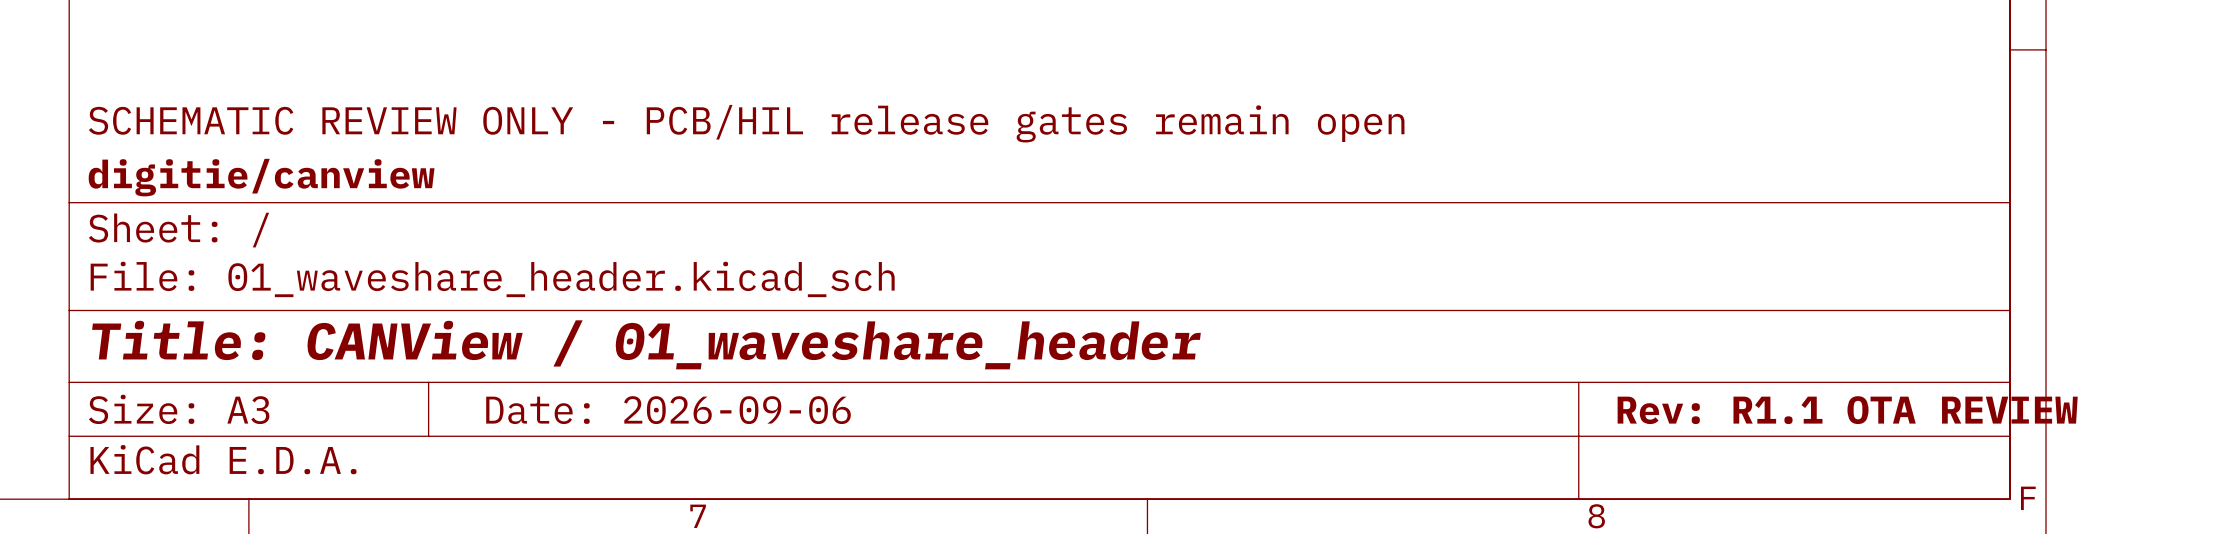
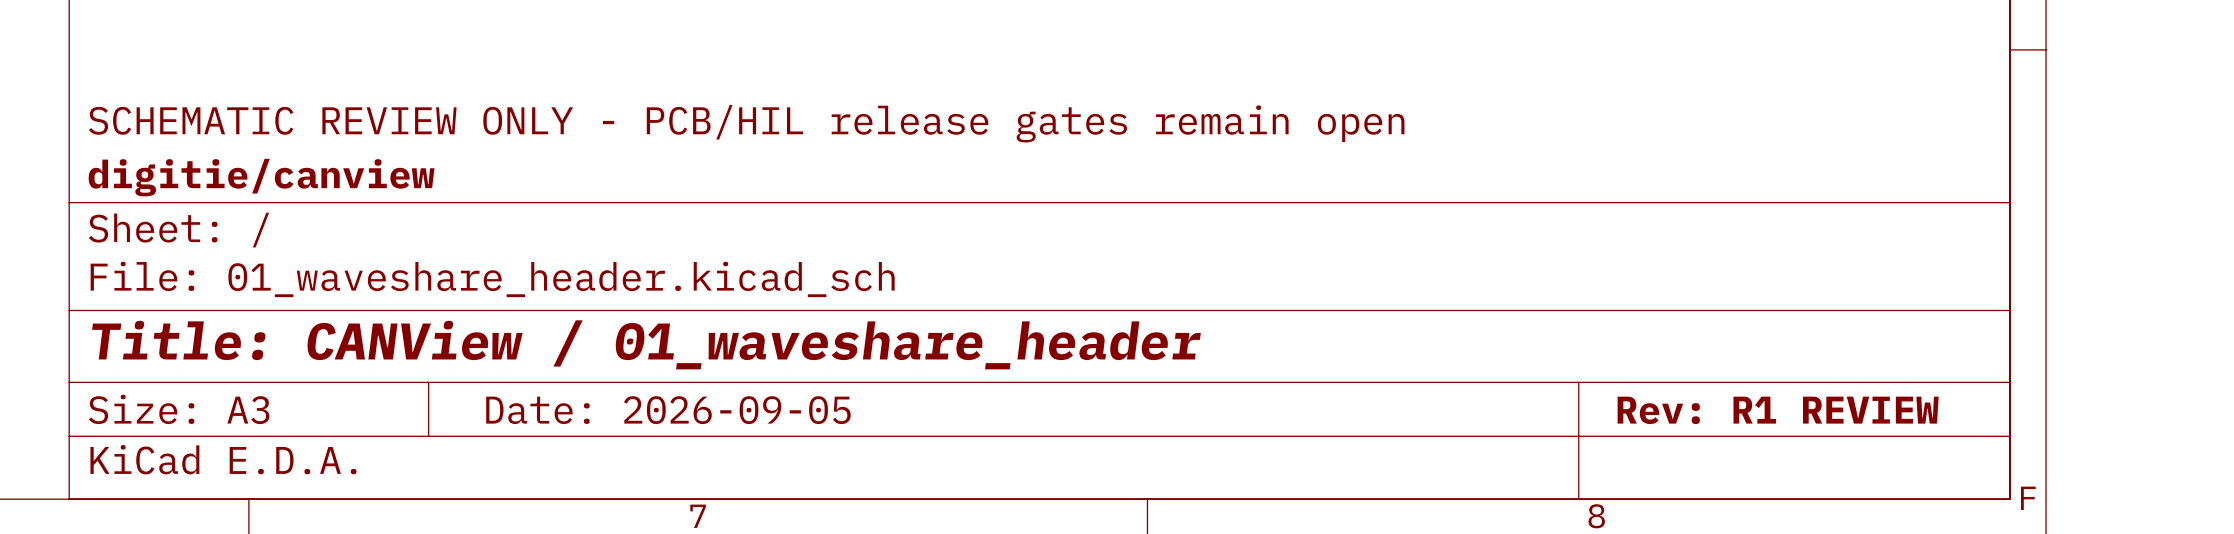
title block: Date: 2026-09-06 (668, 410) -> Date: 2026-09-05 (668, 410)
title block: Rev: R1.1 OTA REVIEW (1847, 410) -> Rev: R1 REVIEW (1778, 410)

